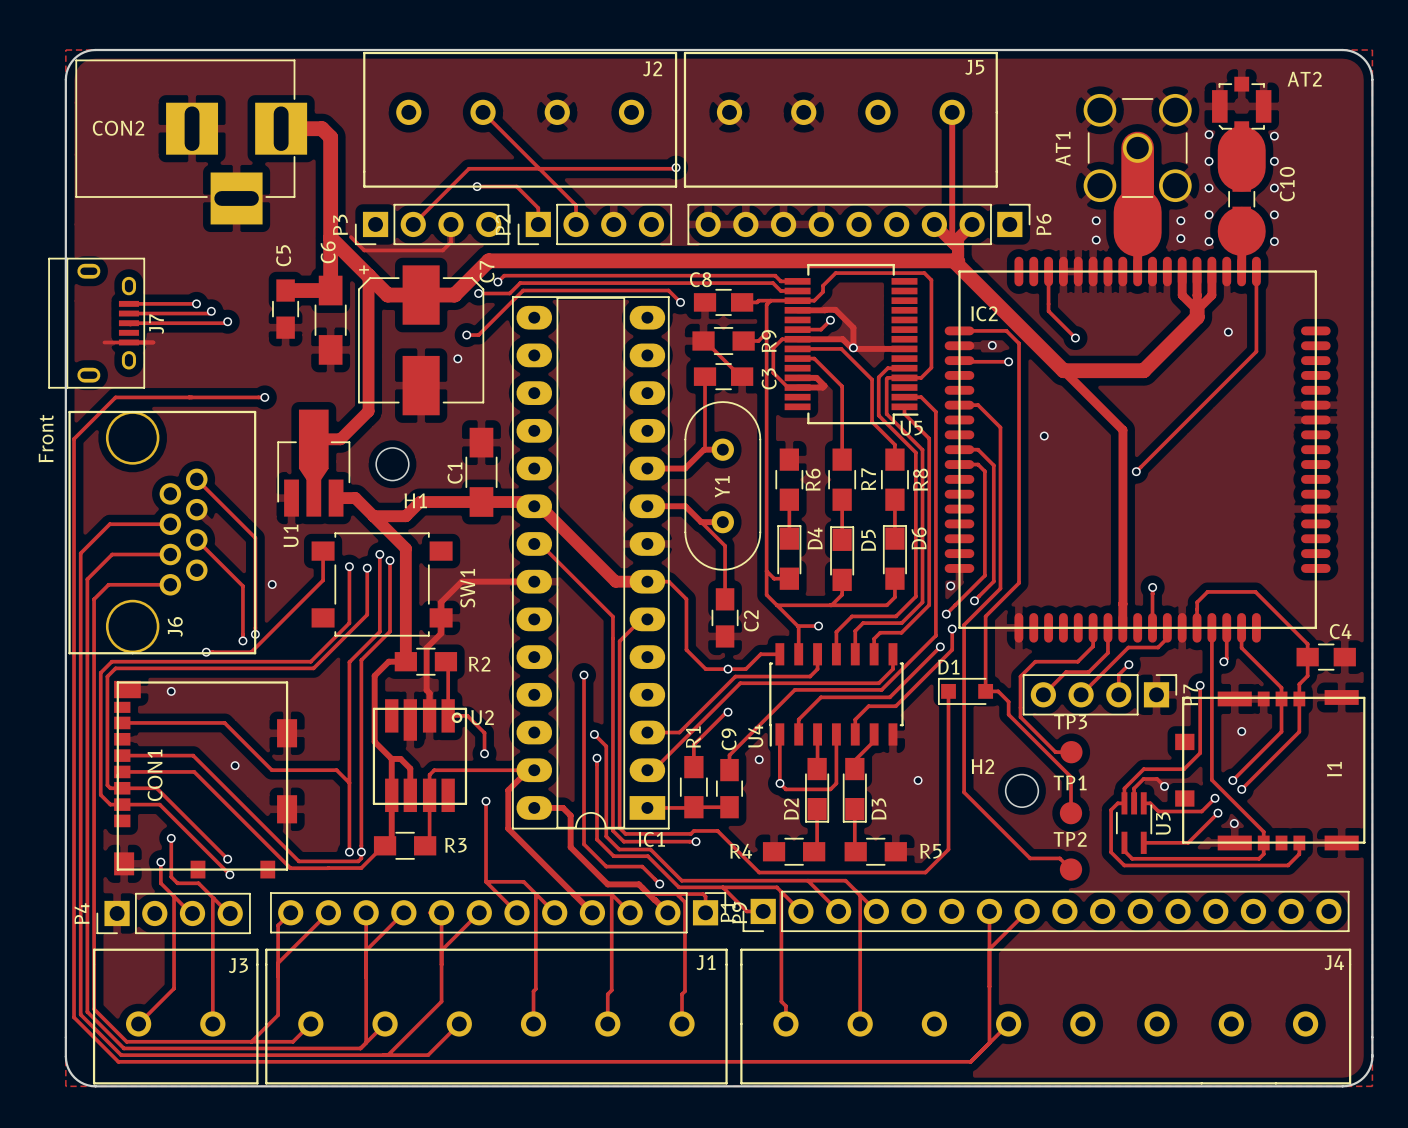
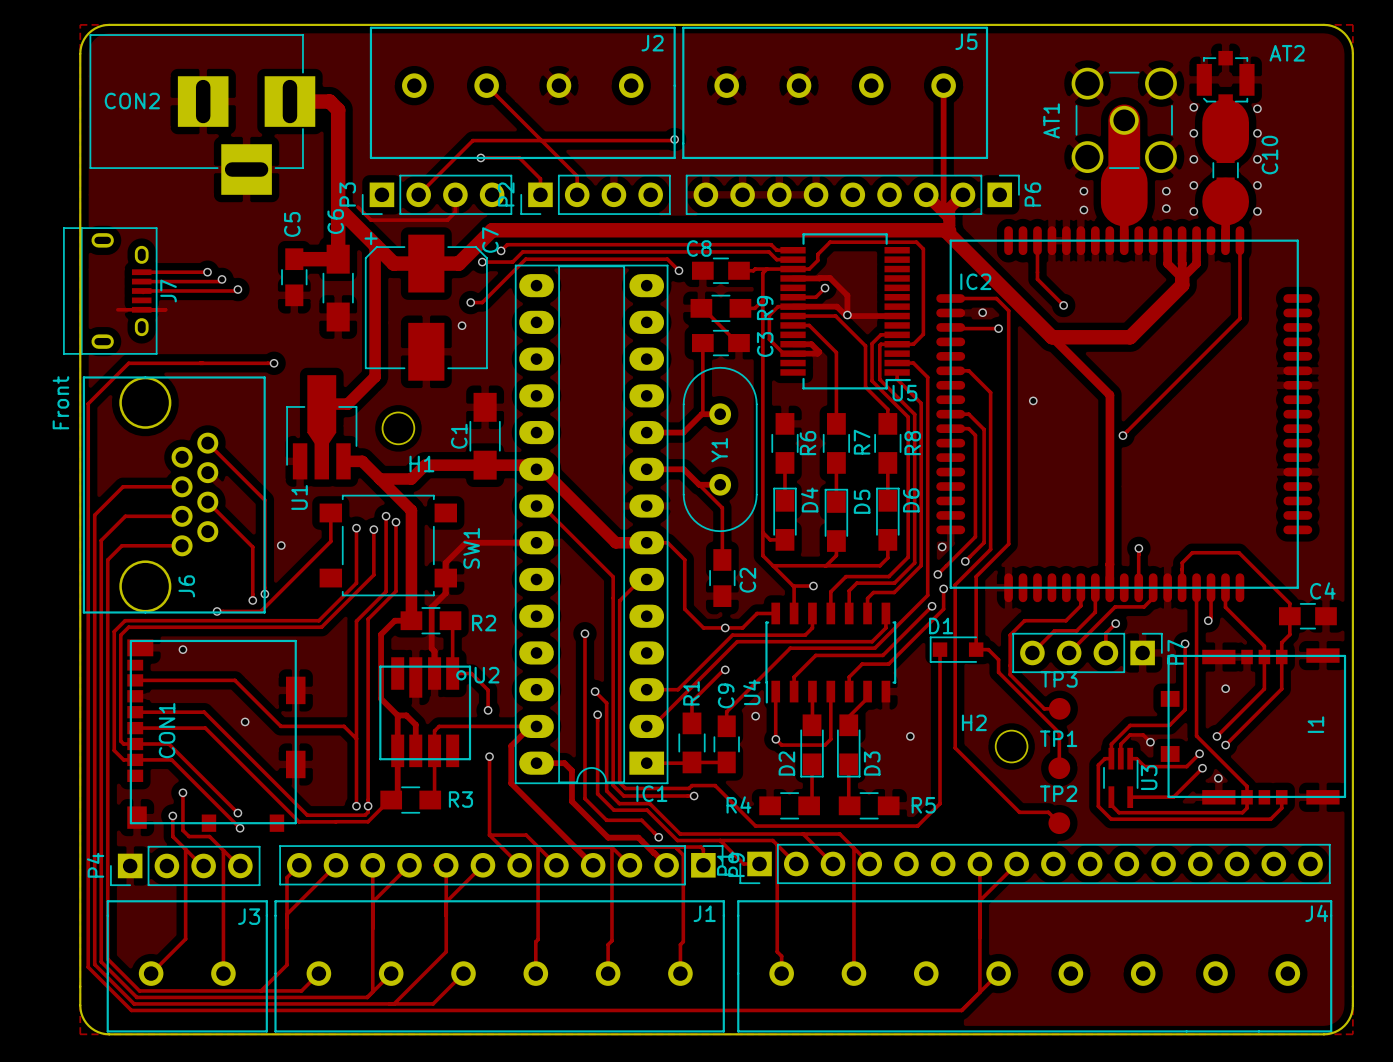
via: (1228, 332) -> none

